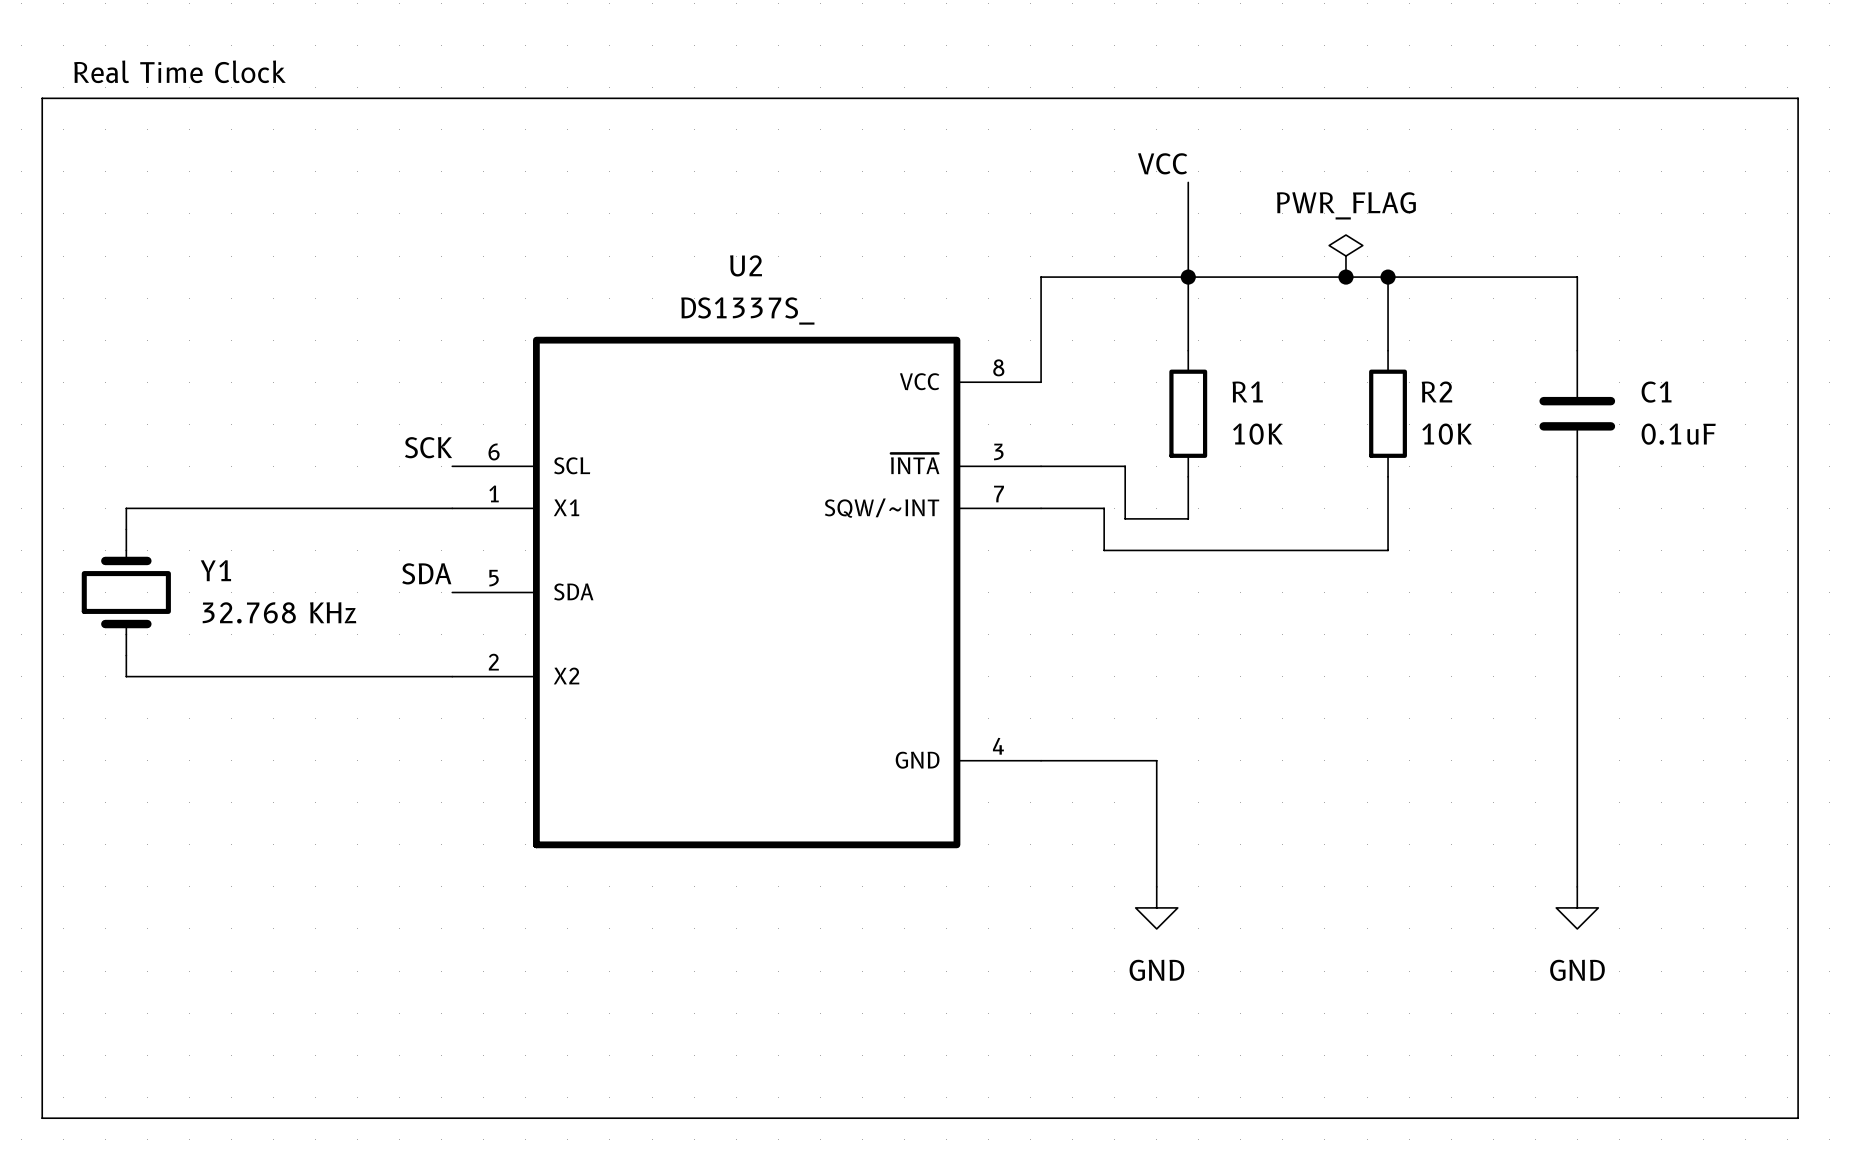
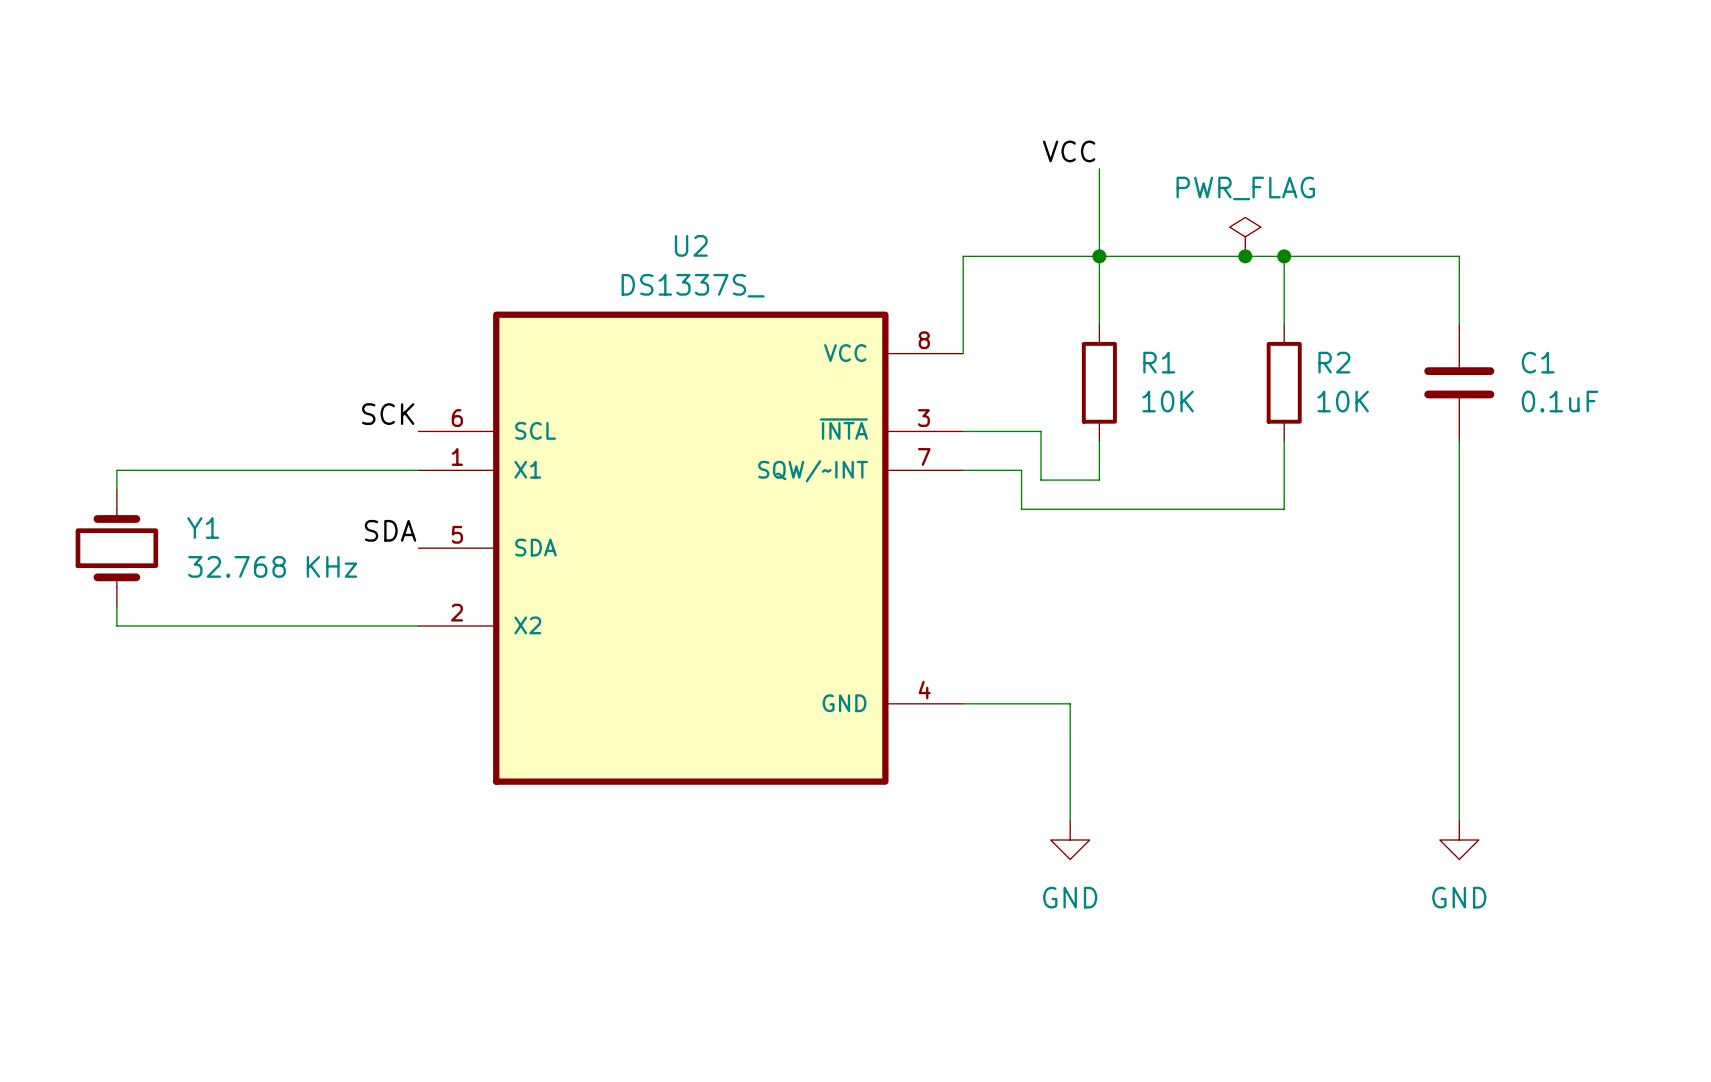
text: Real Time Clock (179, 71) -> none
line: (42, 98) (1798, 98) (1798, 1118) (42, 1118) (42, 98) -> none

